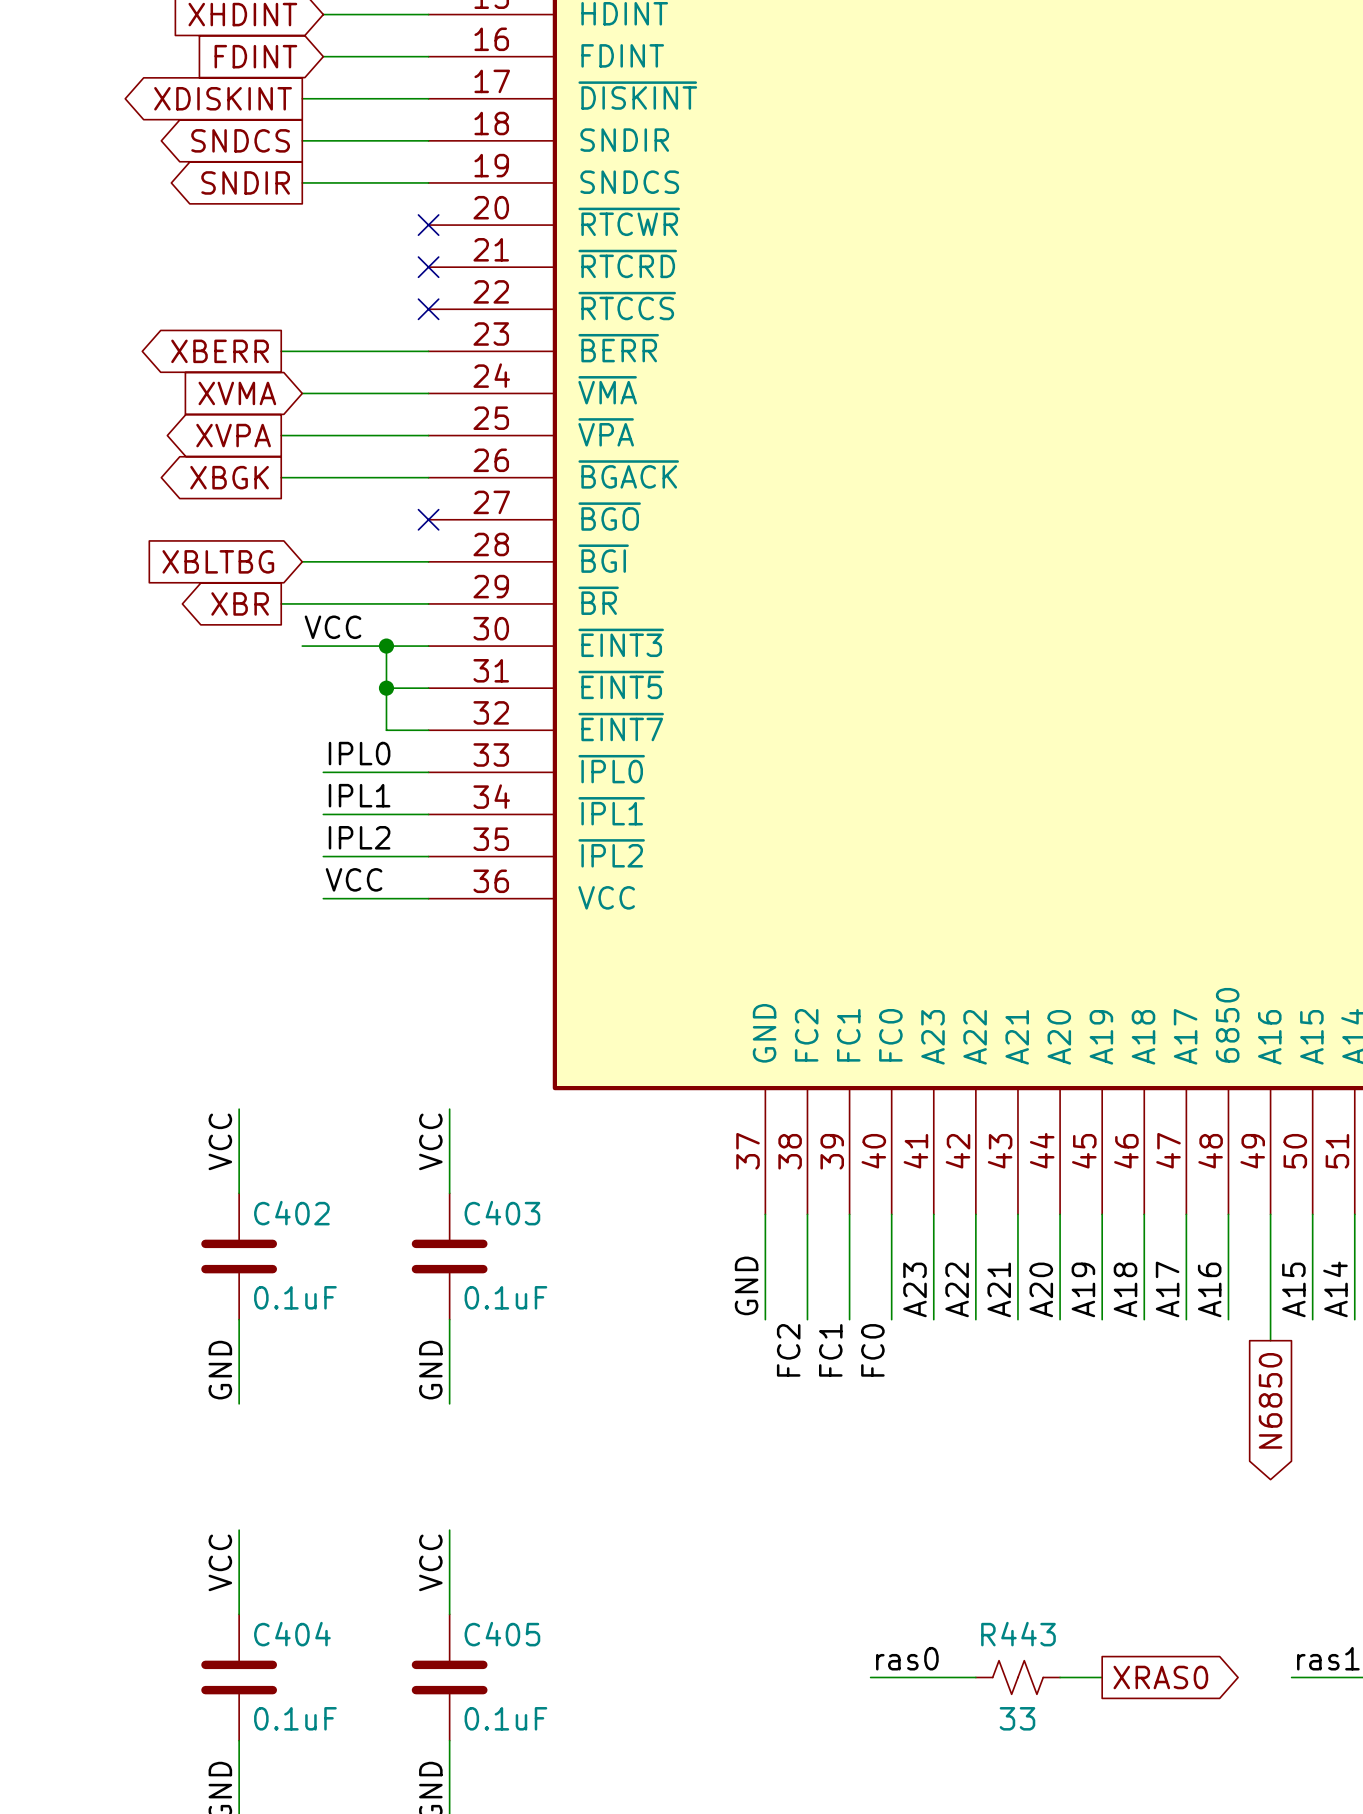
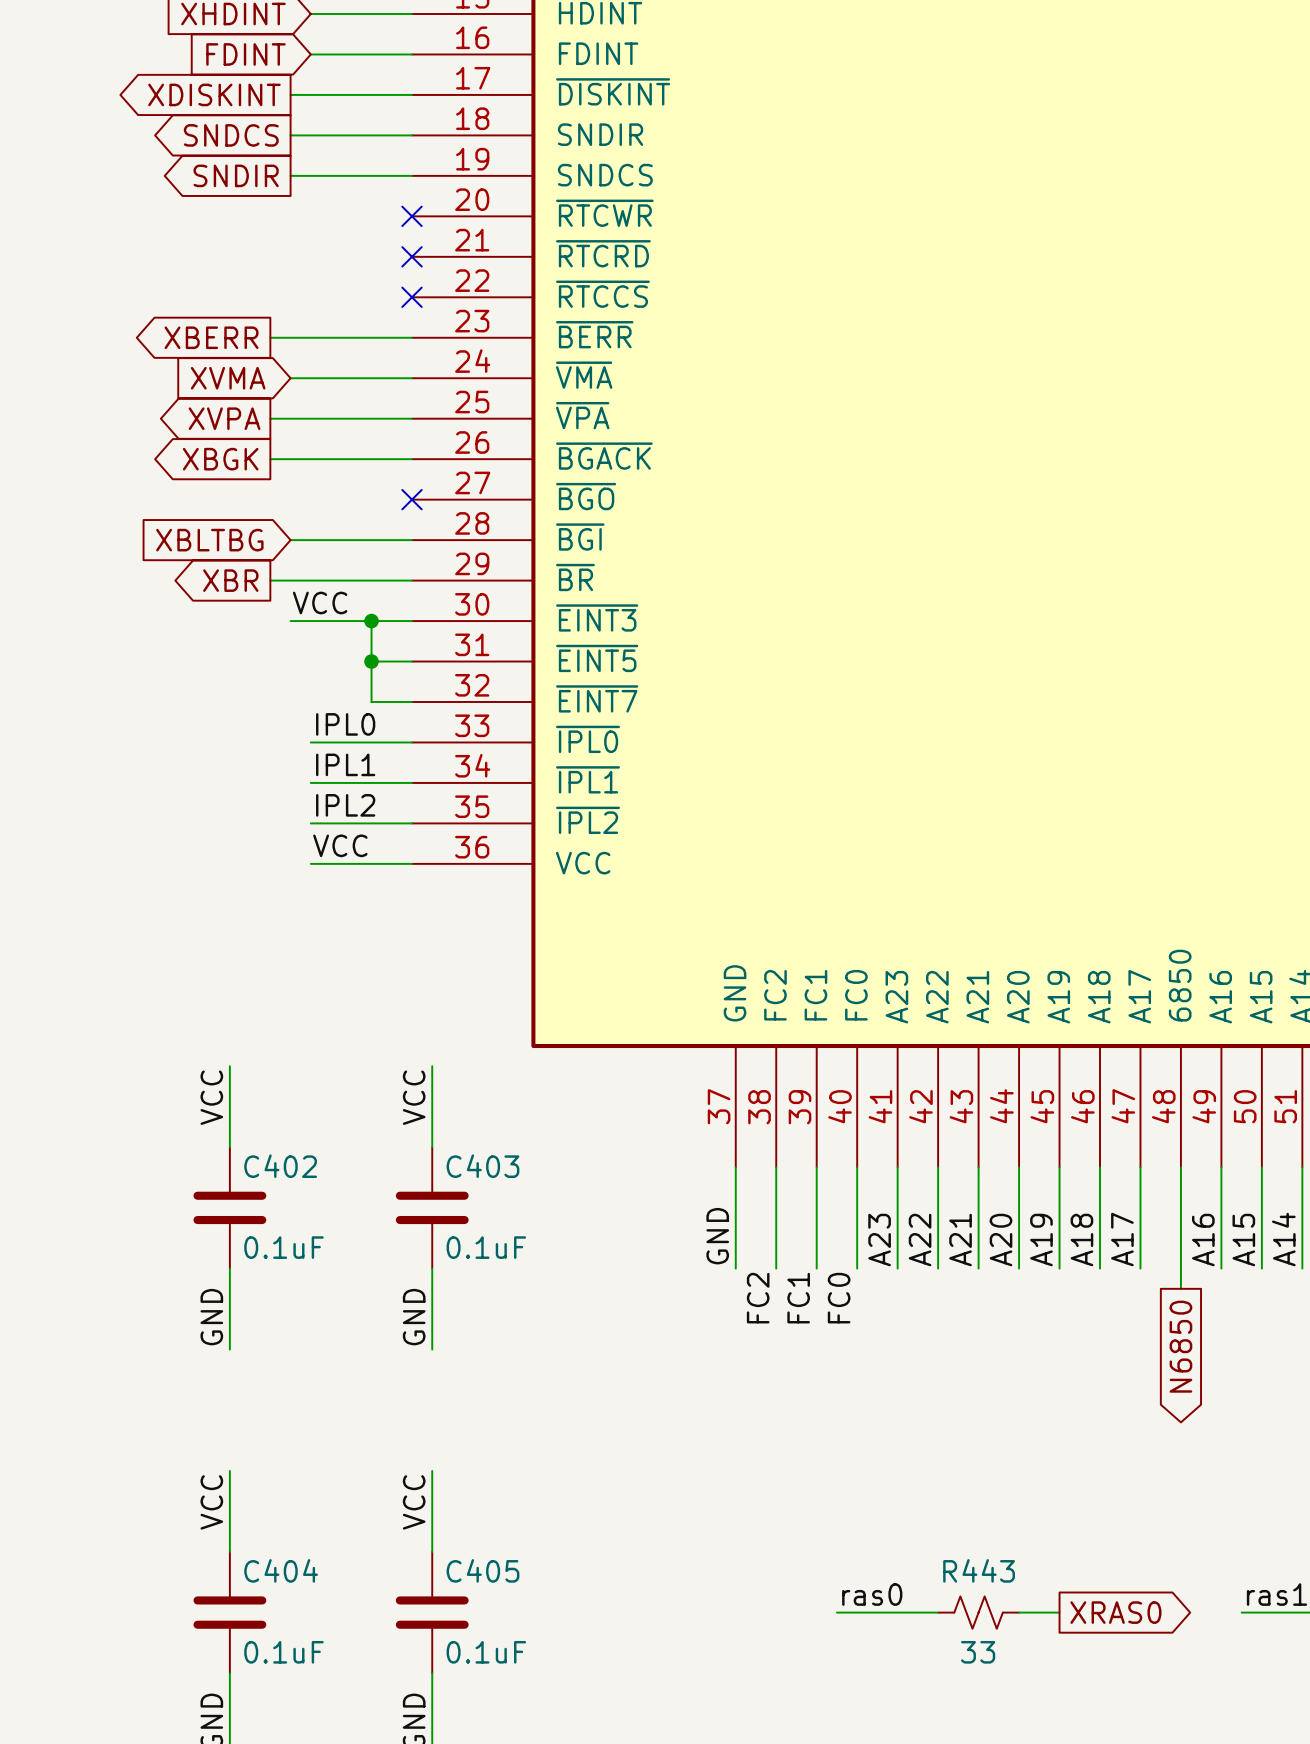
label position: A16 (1209, 1289) -> A16 (1203, 1240)
wire: (1270, 1319) (1270, 1340) -> (1180, 1268) (1180, 1288)
global label position: N6850 (1270, 1400) -> N6850 (1180, 1346)

